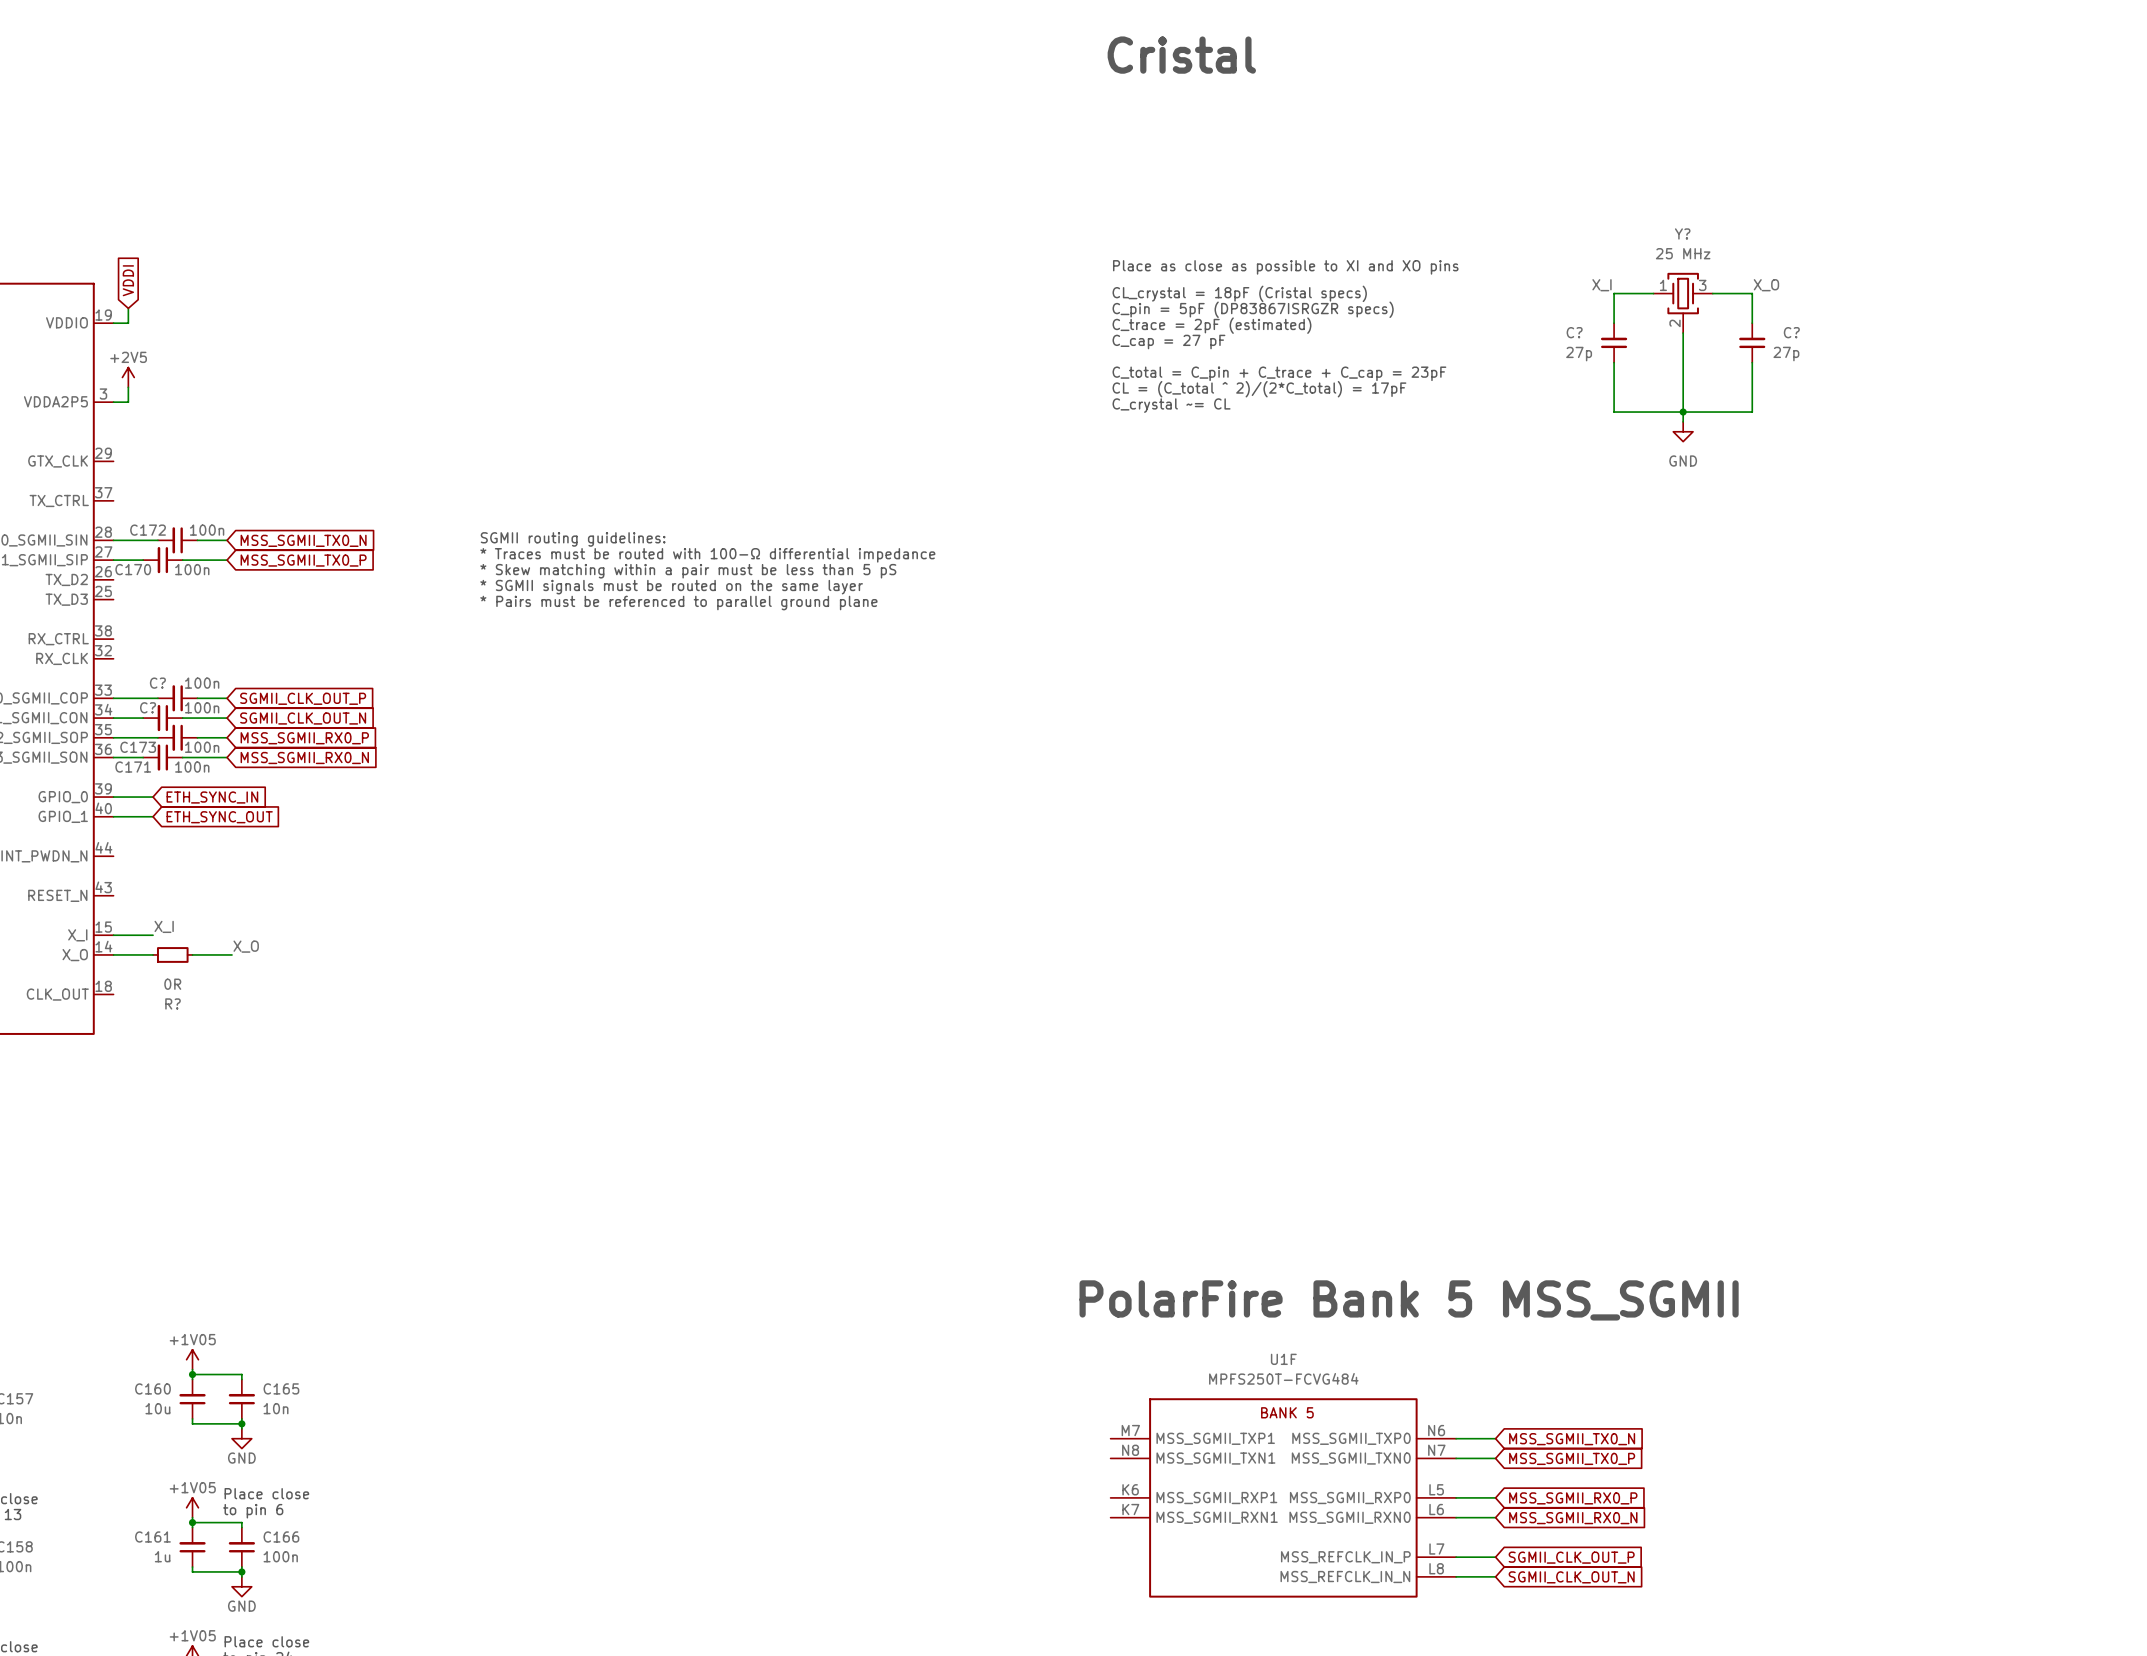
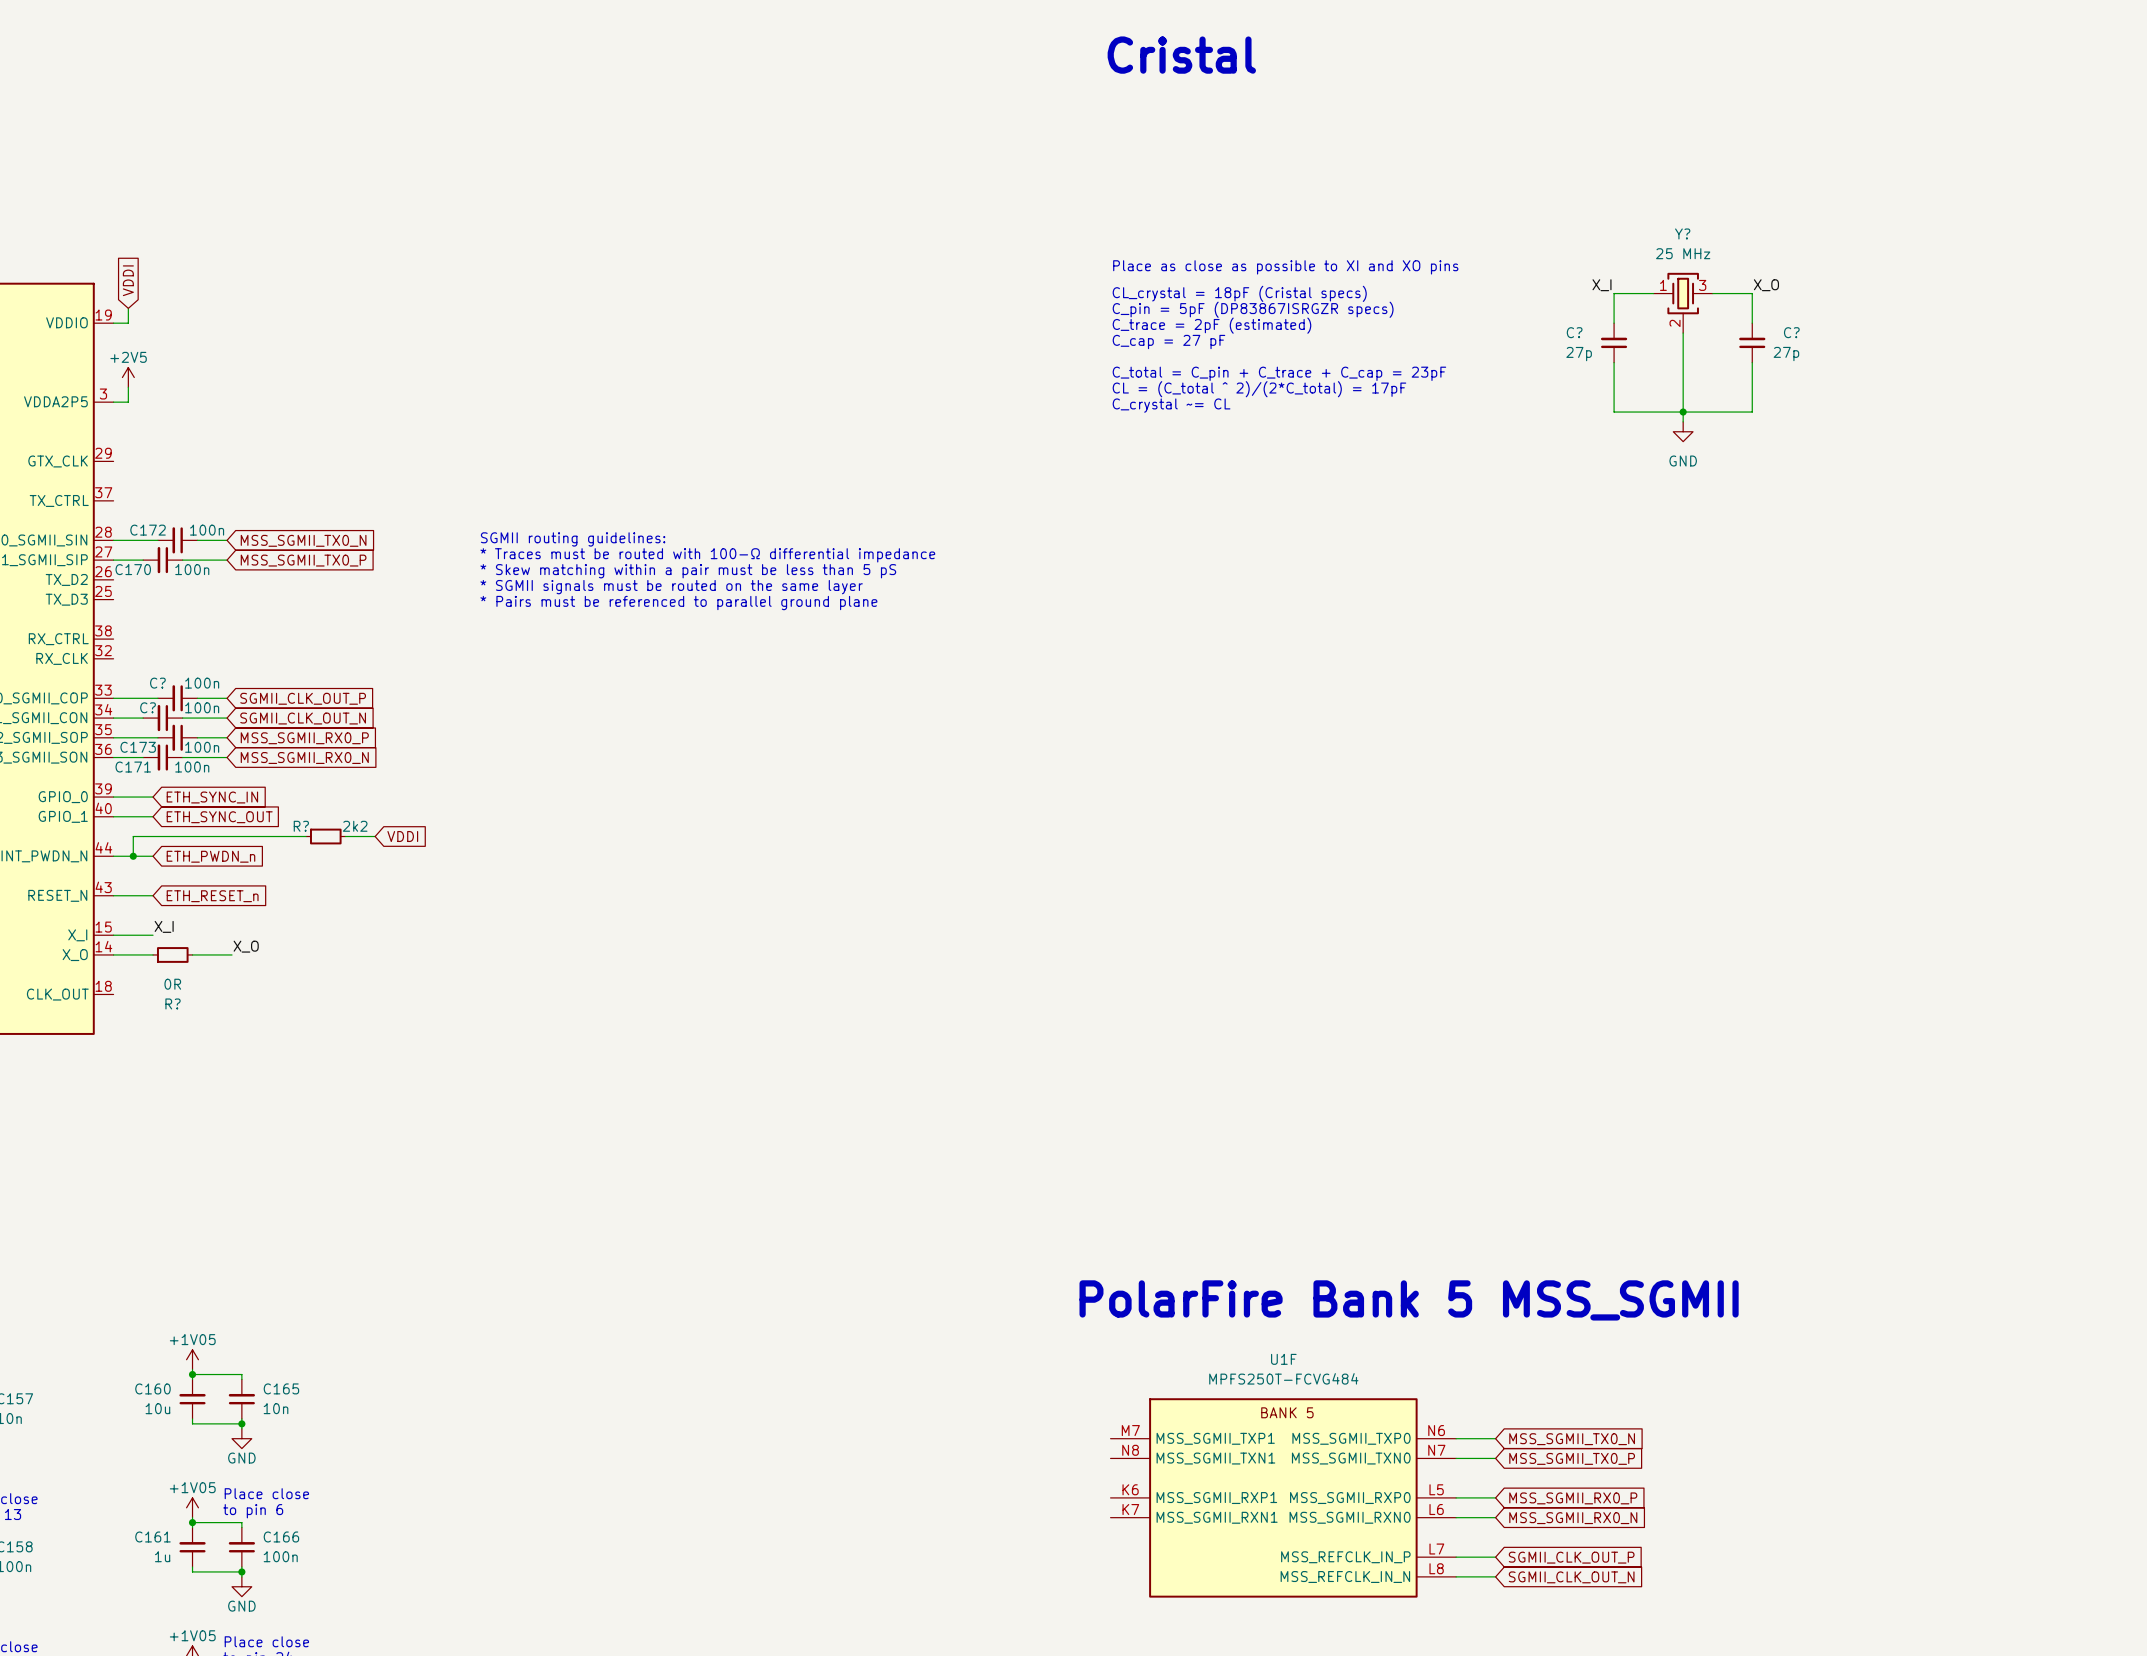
wire: none -> (306, 836) (133, 836) (133, 856)
R?: none -> (325, 836)
wire: none -> (345, 836) (375, 836)
global label: none -> VDDI (402, 836)
wire: none -> (113, 856) (153, 856)
junction: none -> (133, 856)
global label: none -> ETH_PWDN_n (210, 856)
wire: none -> (113, 895) (153, 895)
global label: none -> ETH_RESET_n (212, 896)

